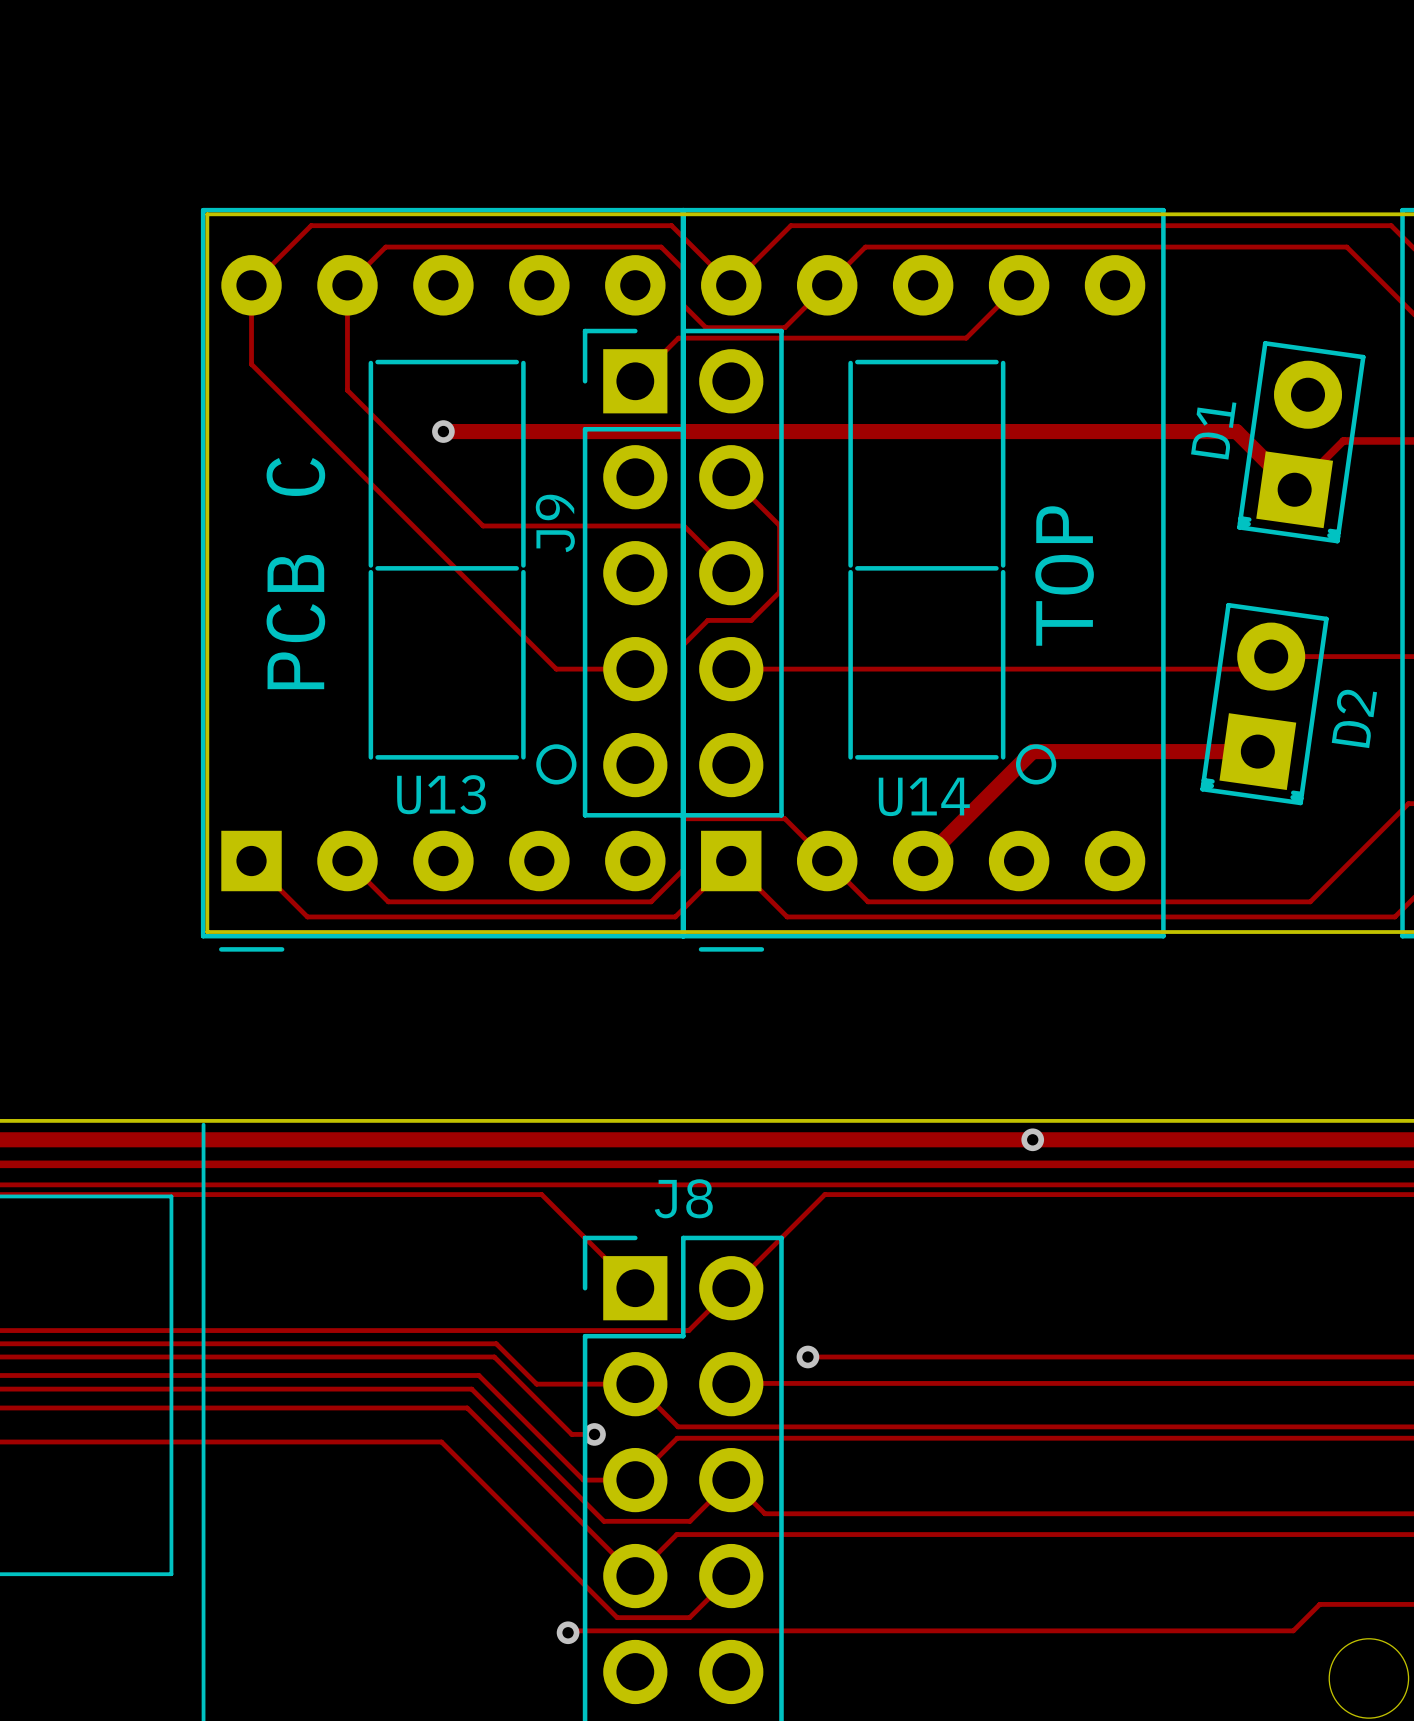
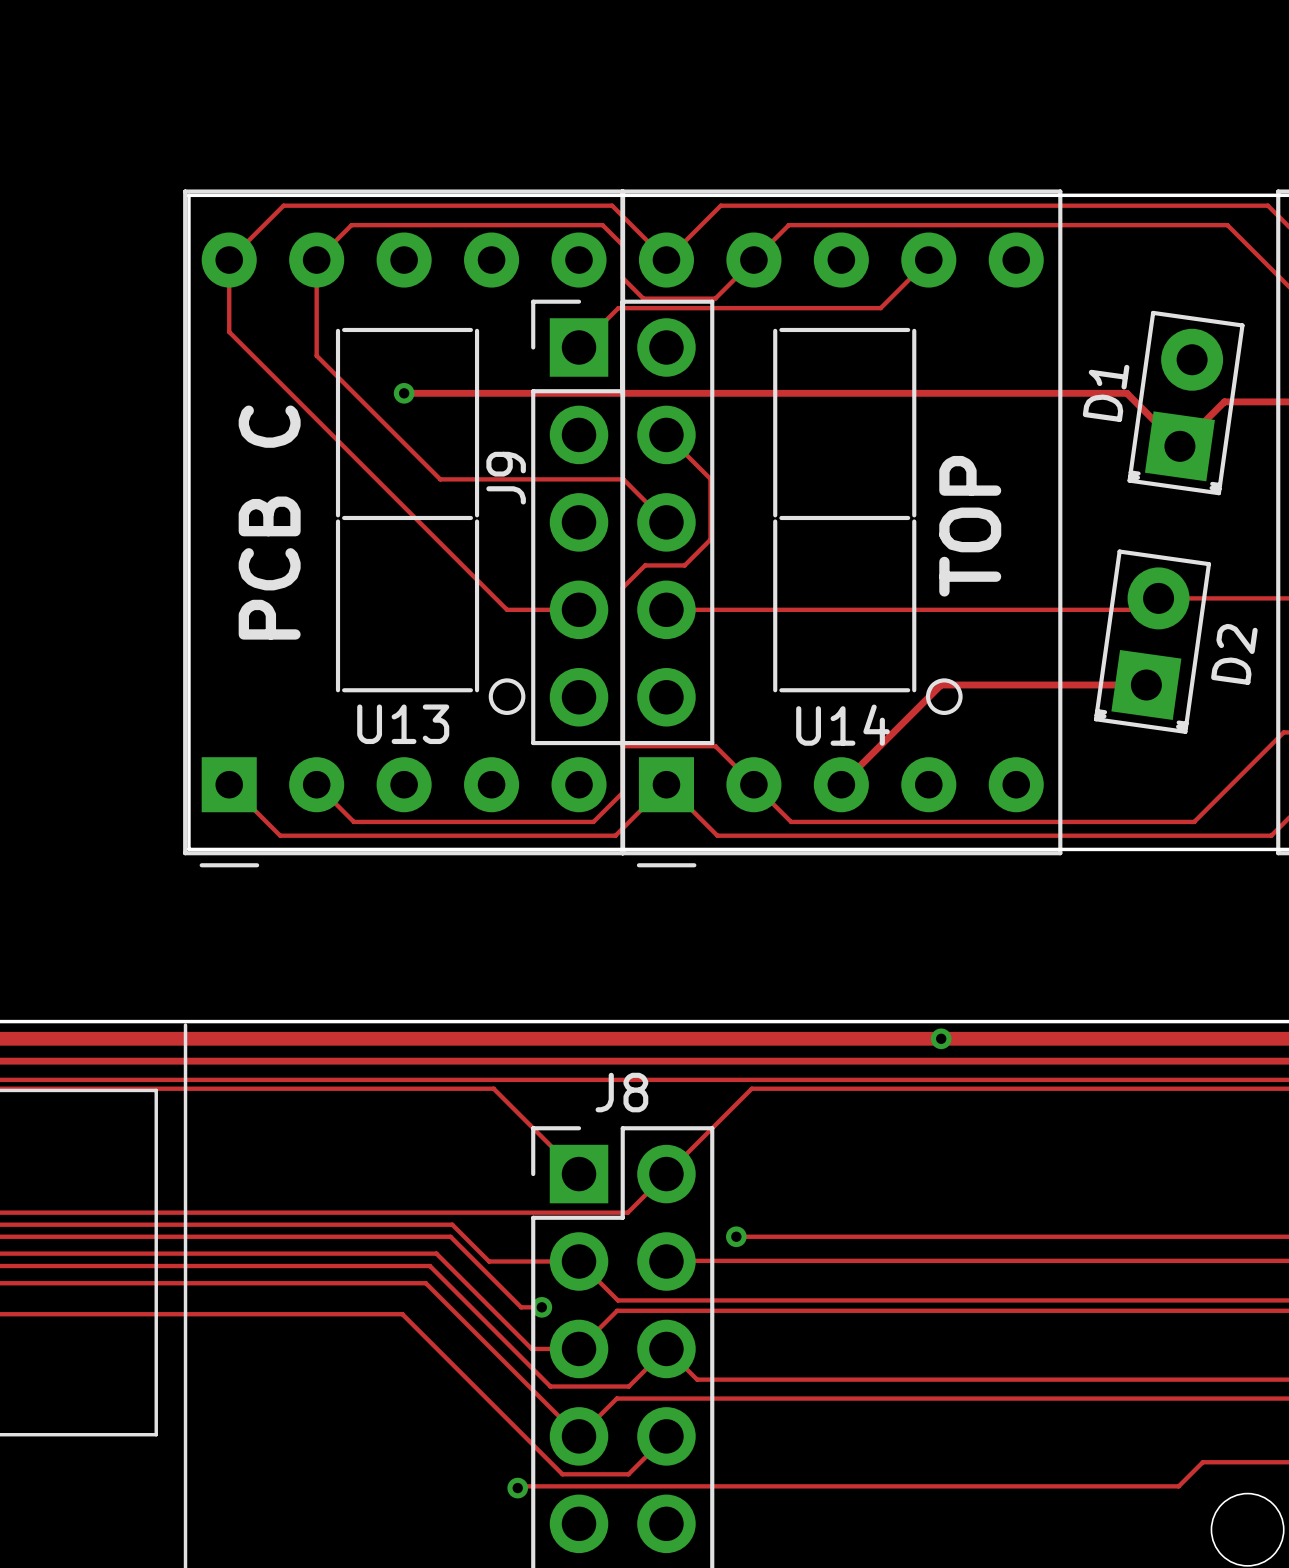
track width: thick (443, 431) (1236, 431) (1294, 489) -> thin (404, 393) (1126, 393) (1179, 446)
track width: thick (1257, 751) (1032, 751) (923, 861) -> thin (1146, 684) (941, 684) (841, 784)

